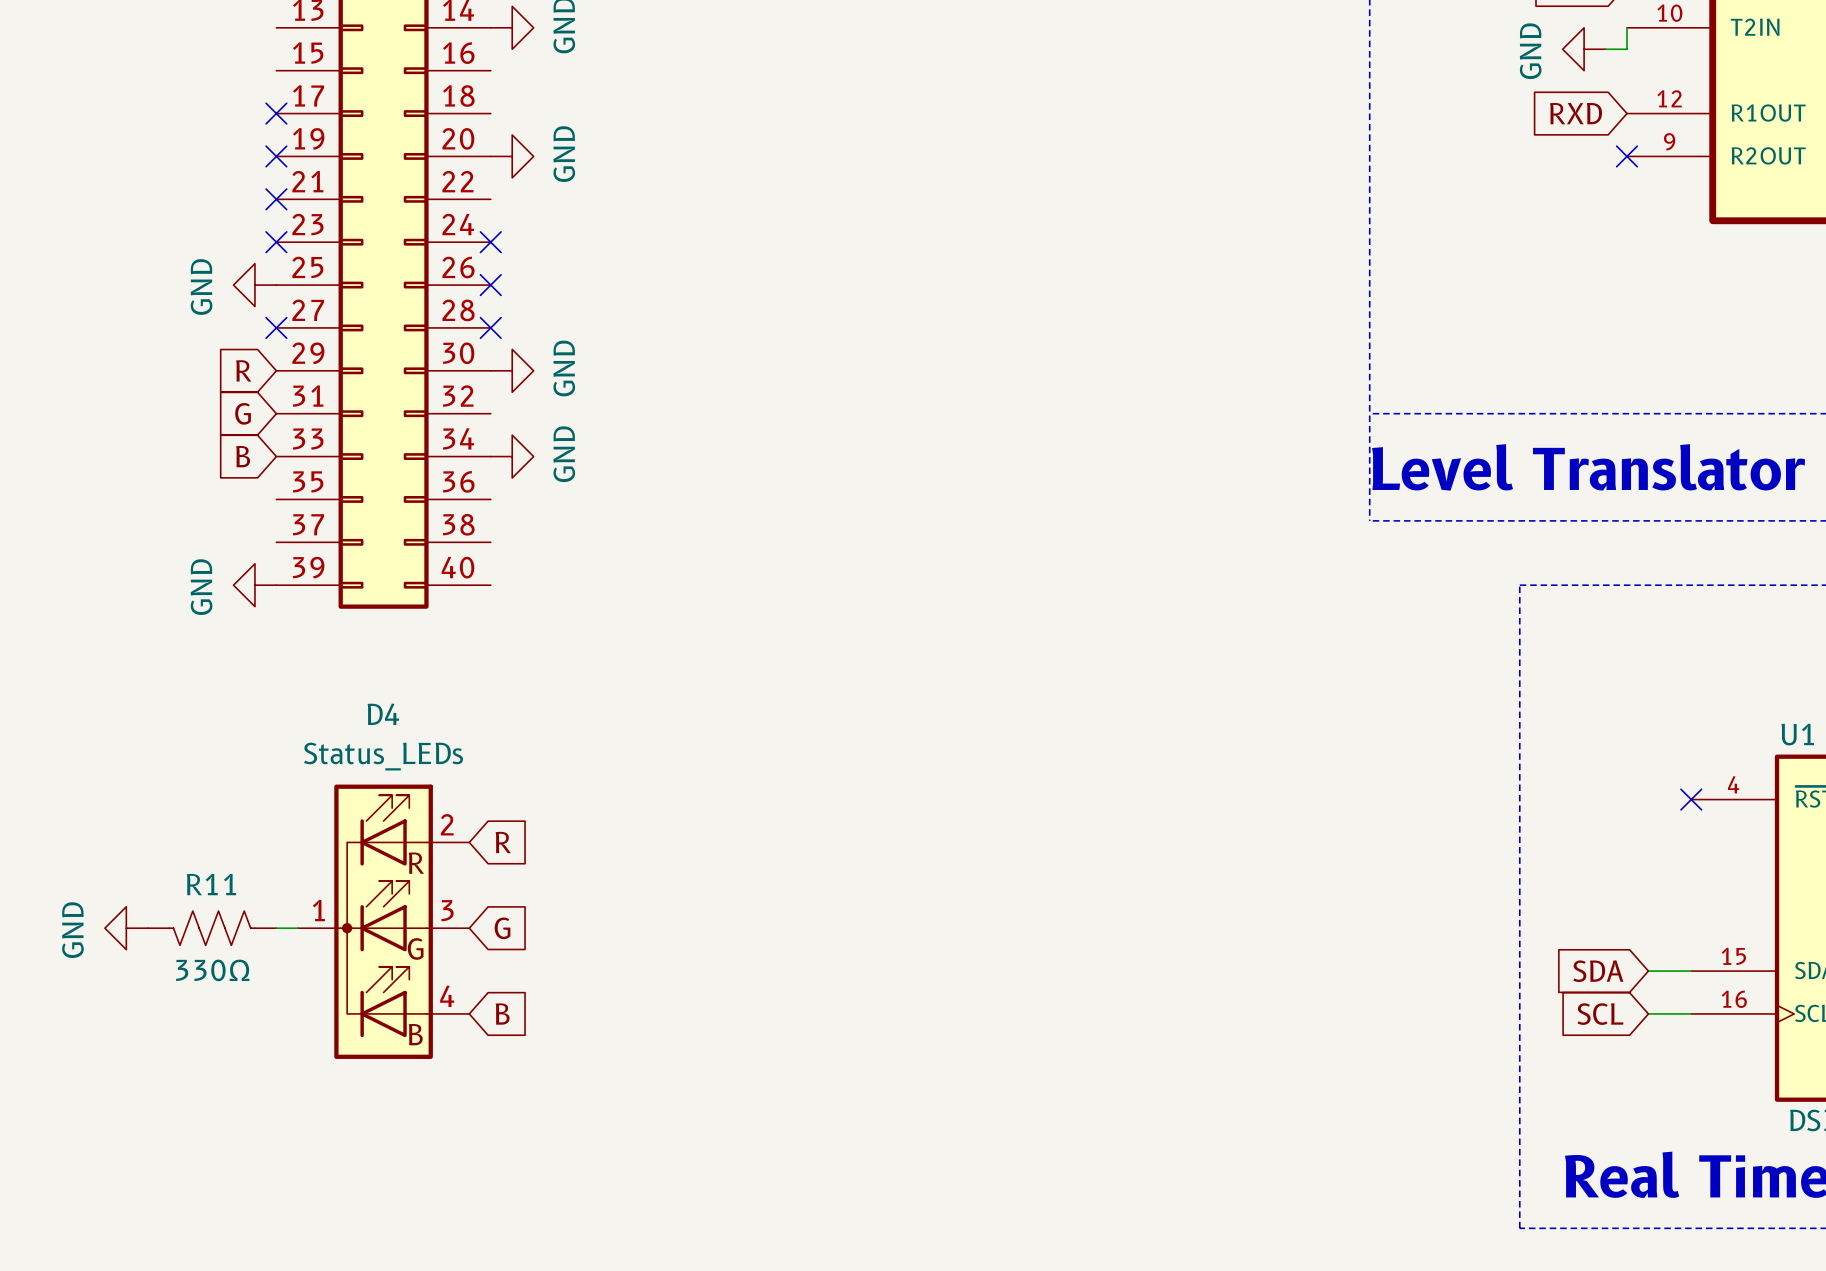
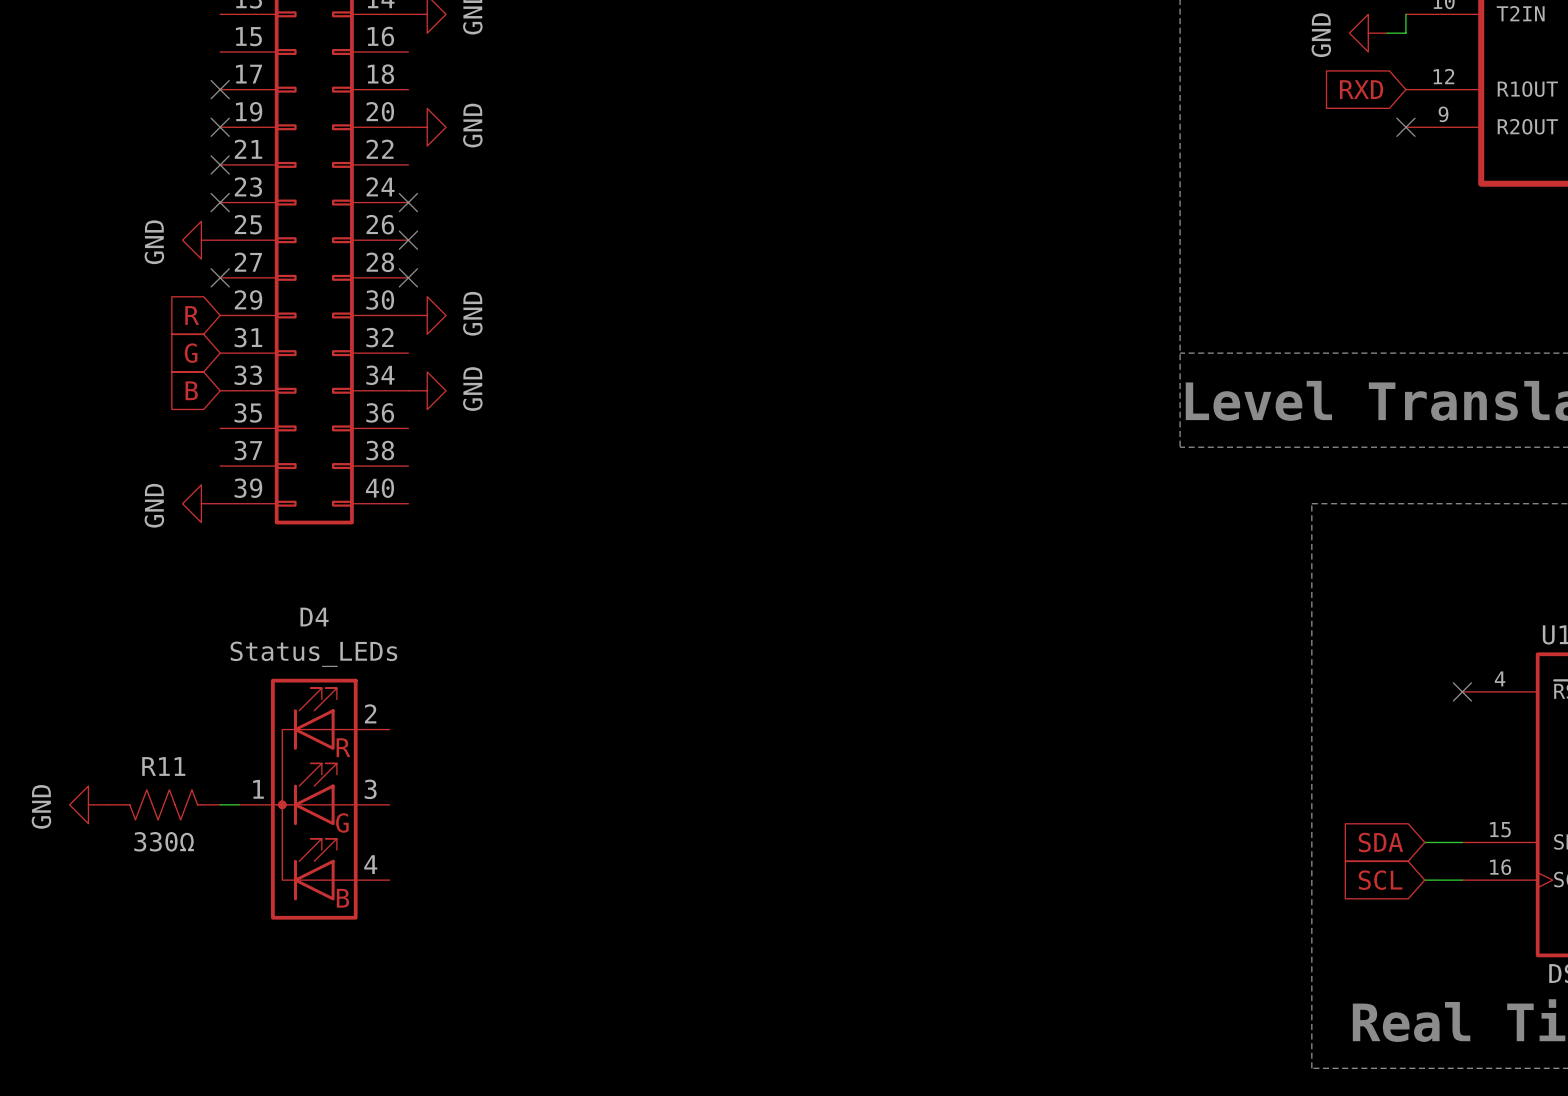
global label: R (503, 842) -> none
global label: G (502, 928) -> none
global label: B (502, 1014) -> none

